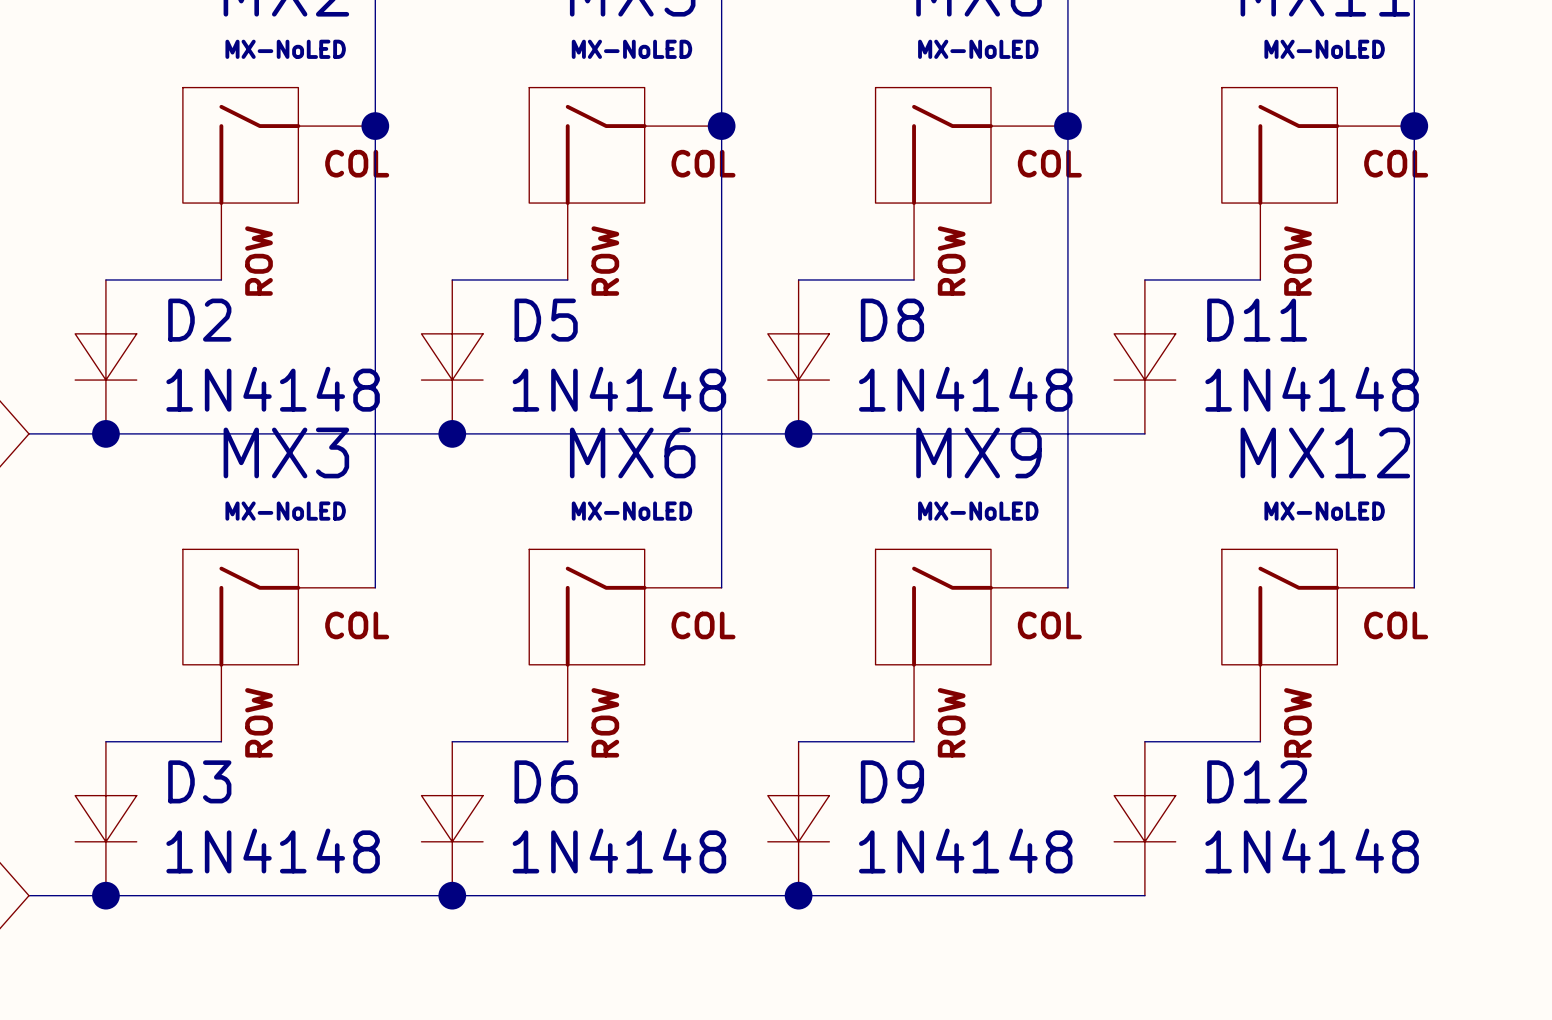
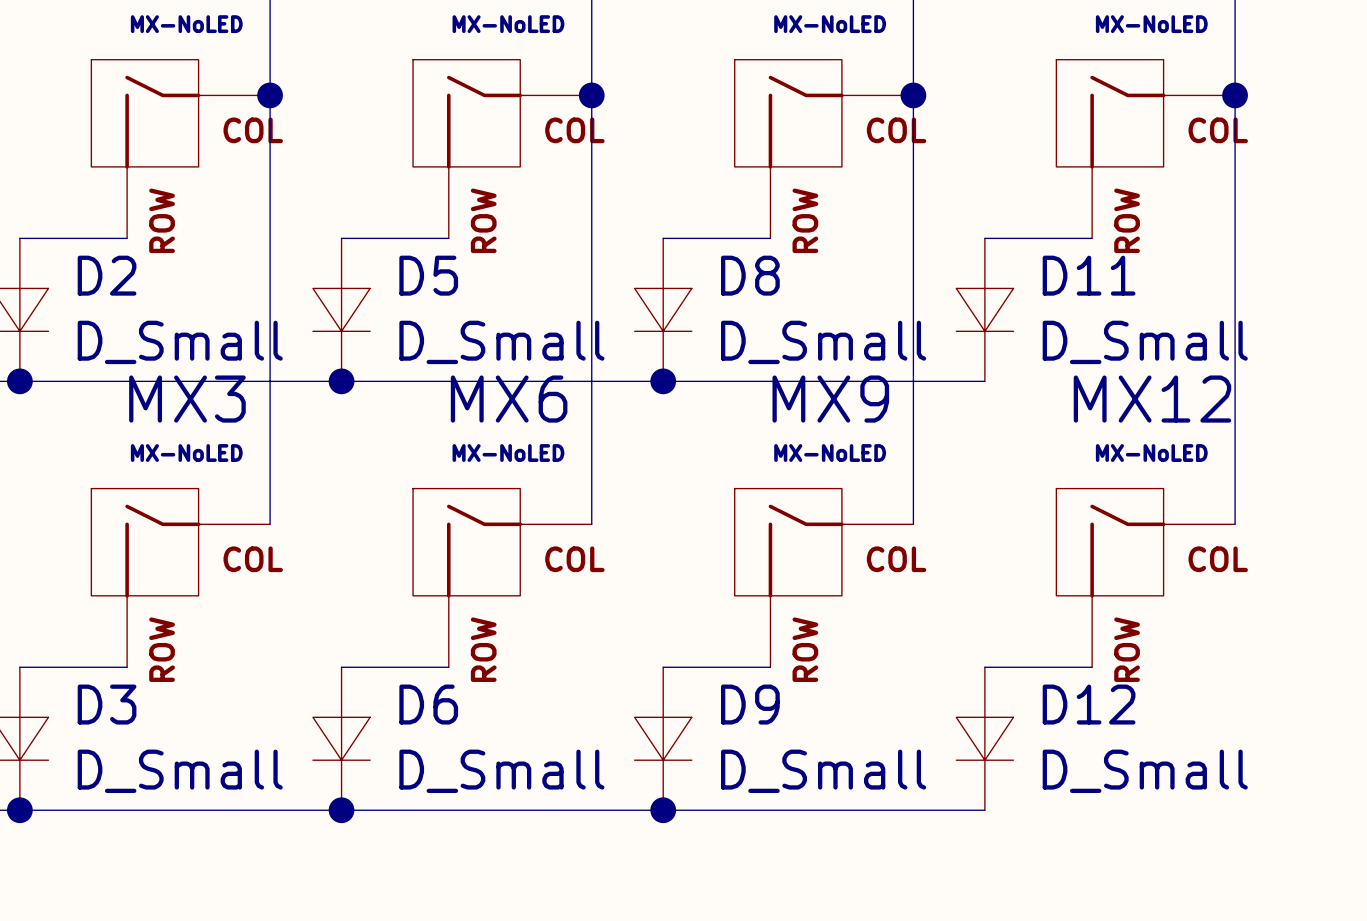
D2 value: 1N4148 (273, 389) -> D_Small (180, 342)
D5 value: 1N4148 (619, 389) -> D_Small (501, 342)
D8 value: 1N4148 (965, 389) -> D_Small (823, 342)
D11 value: 1N4148 (1312, 389) -> D_Small (1145, 342)
D3 value: 1N4148 (273, 850) -> D_Small (180, 771)
D6 value: 1N4148 (619, 850) -> D_Small (501, 771)
D9 value: 1N4148 (965, 850) -> D_Small (823, 771)
D12 value: 1N4148 (1312, 850) -> D_Small (1145, 771)

